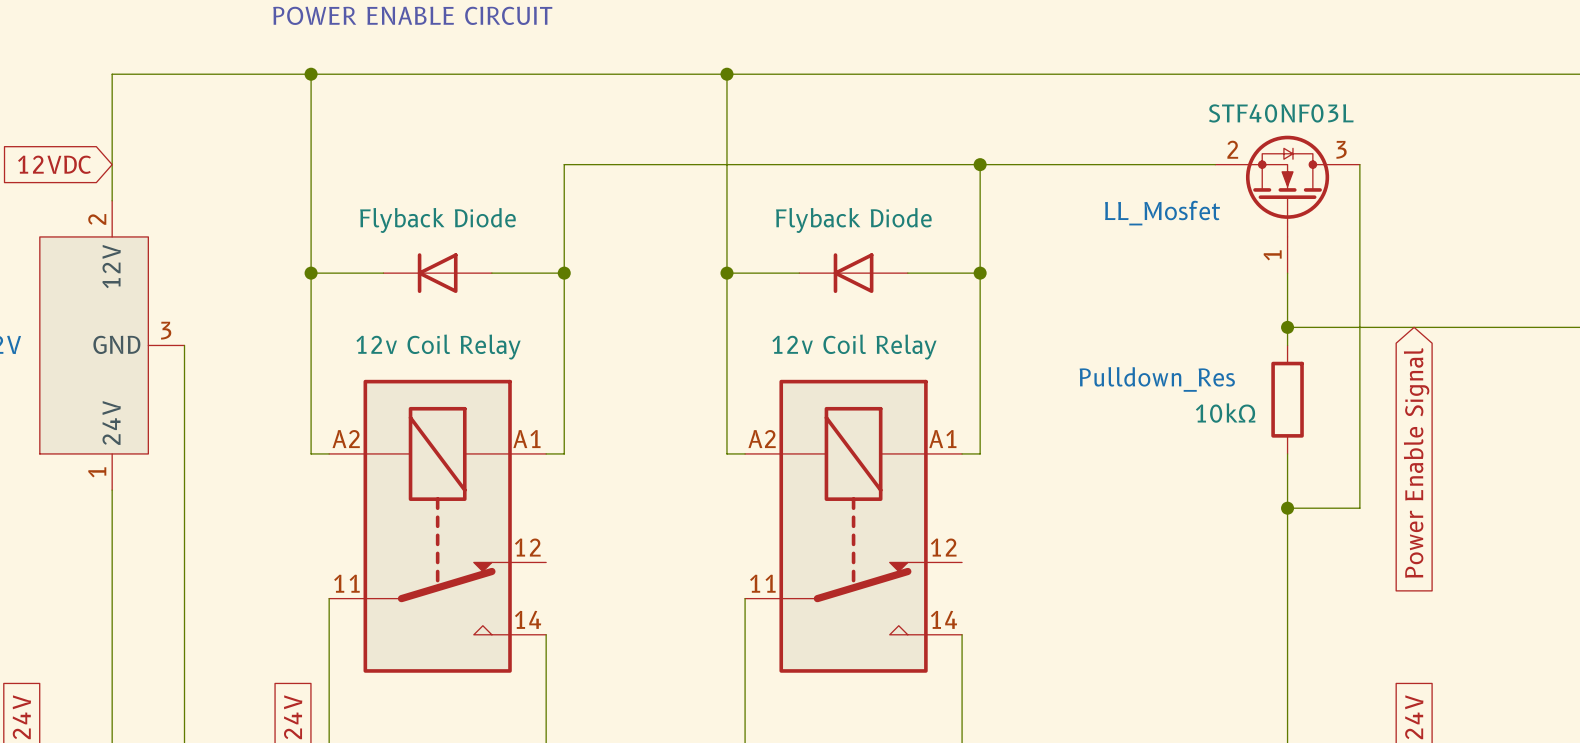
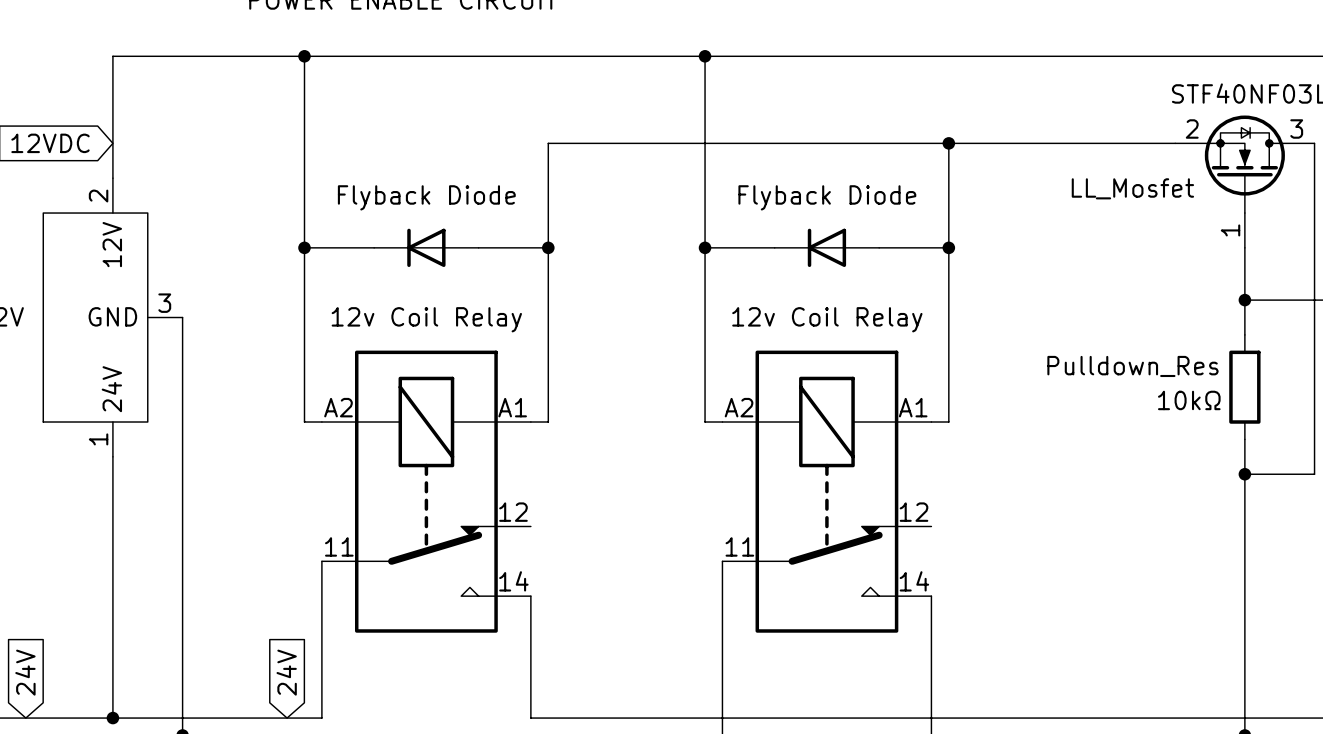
Pulldown_Res position: (1287, 399) -> (1244, 387)

